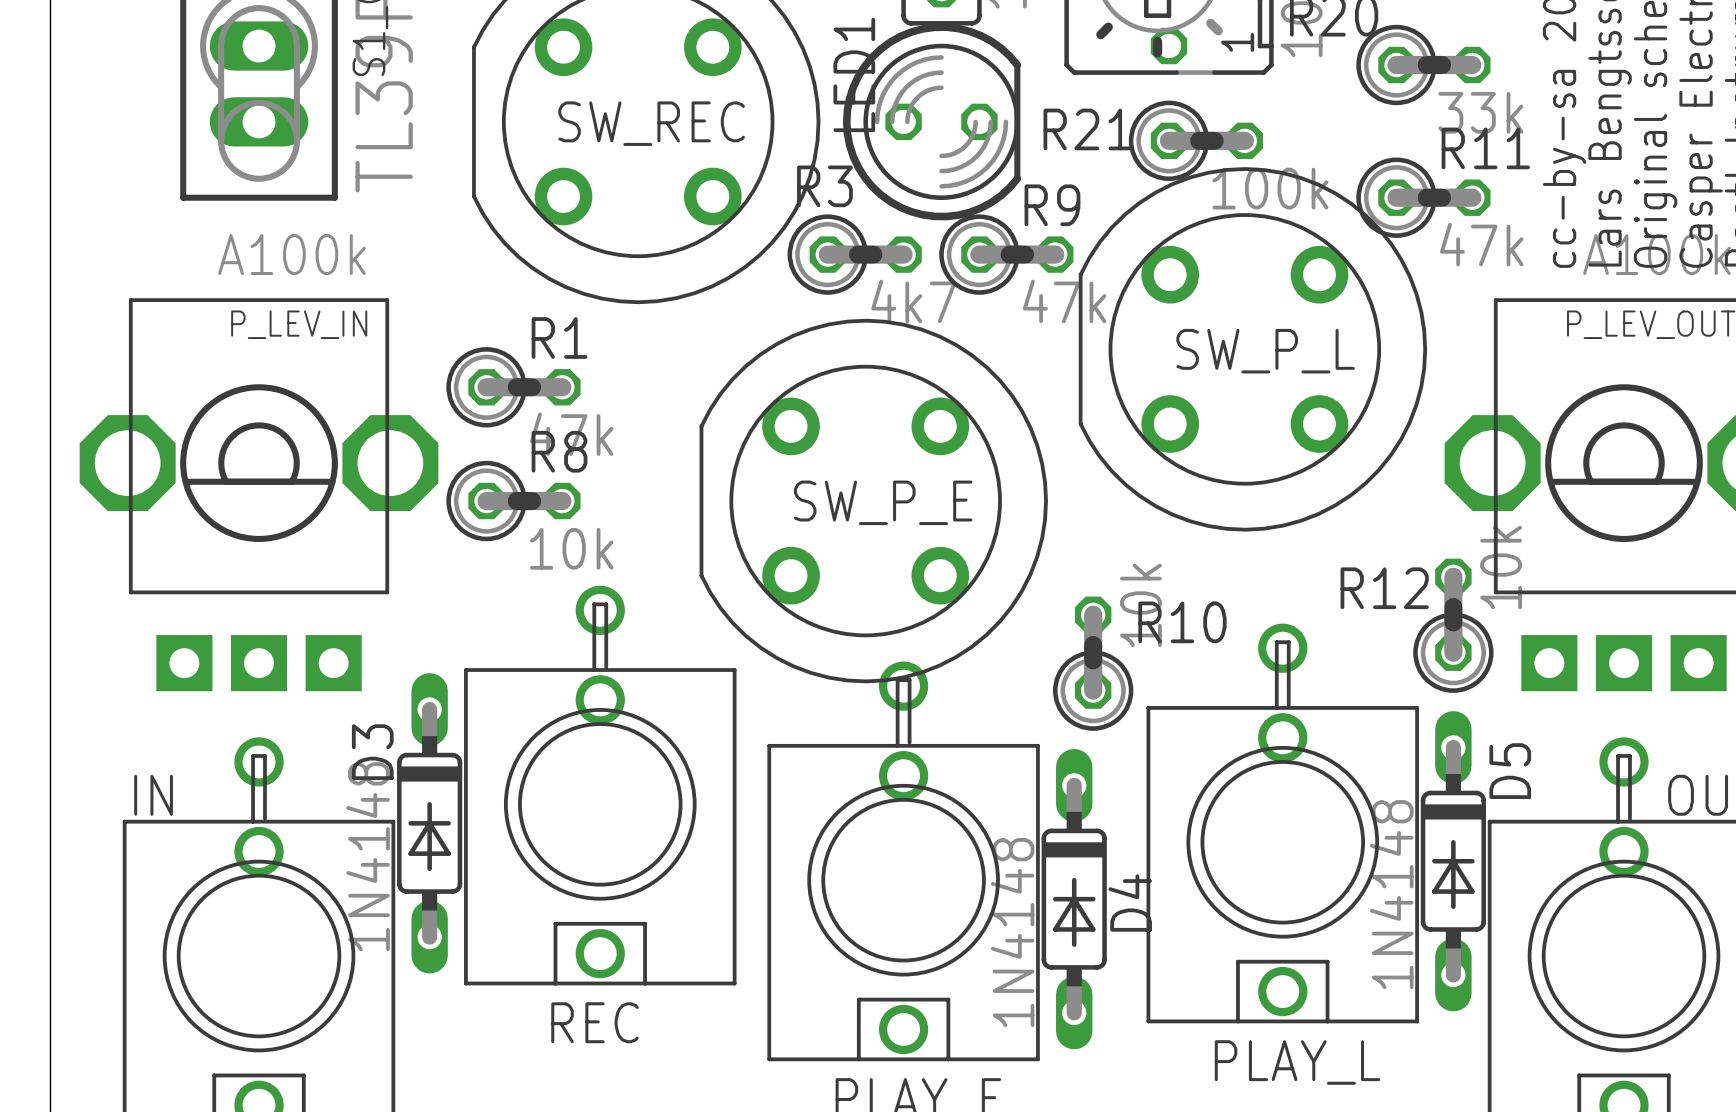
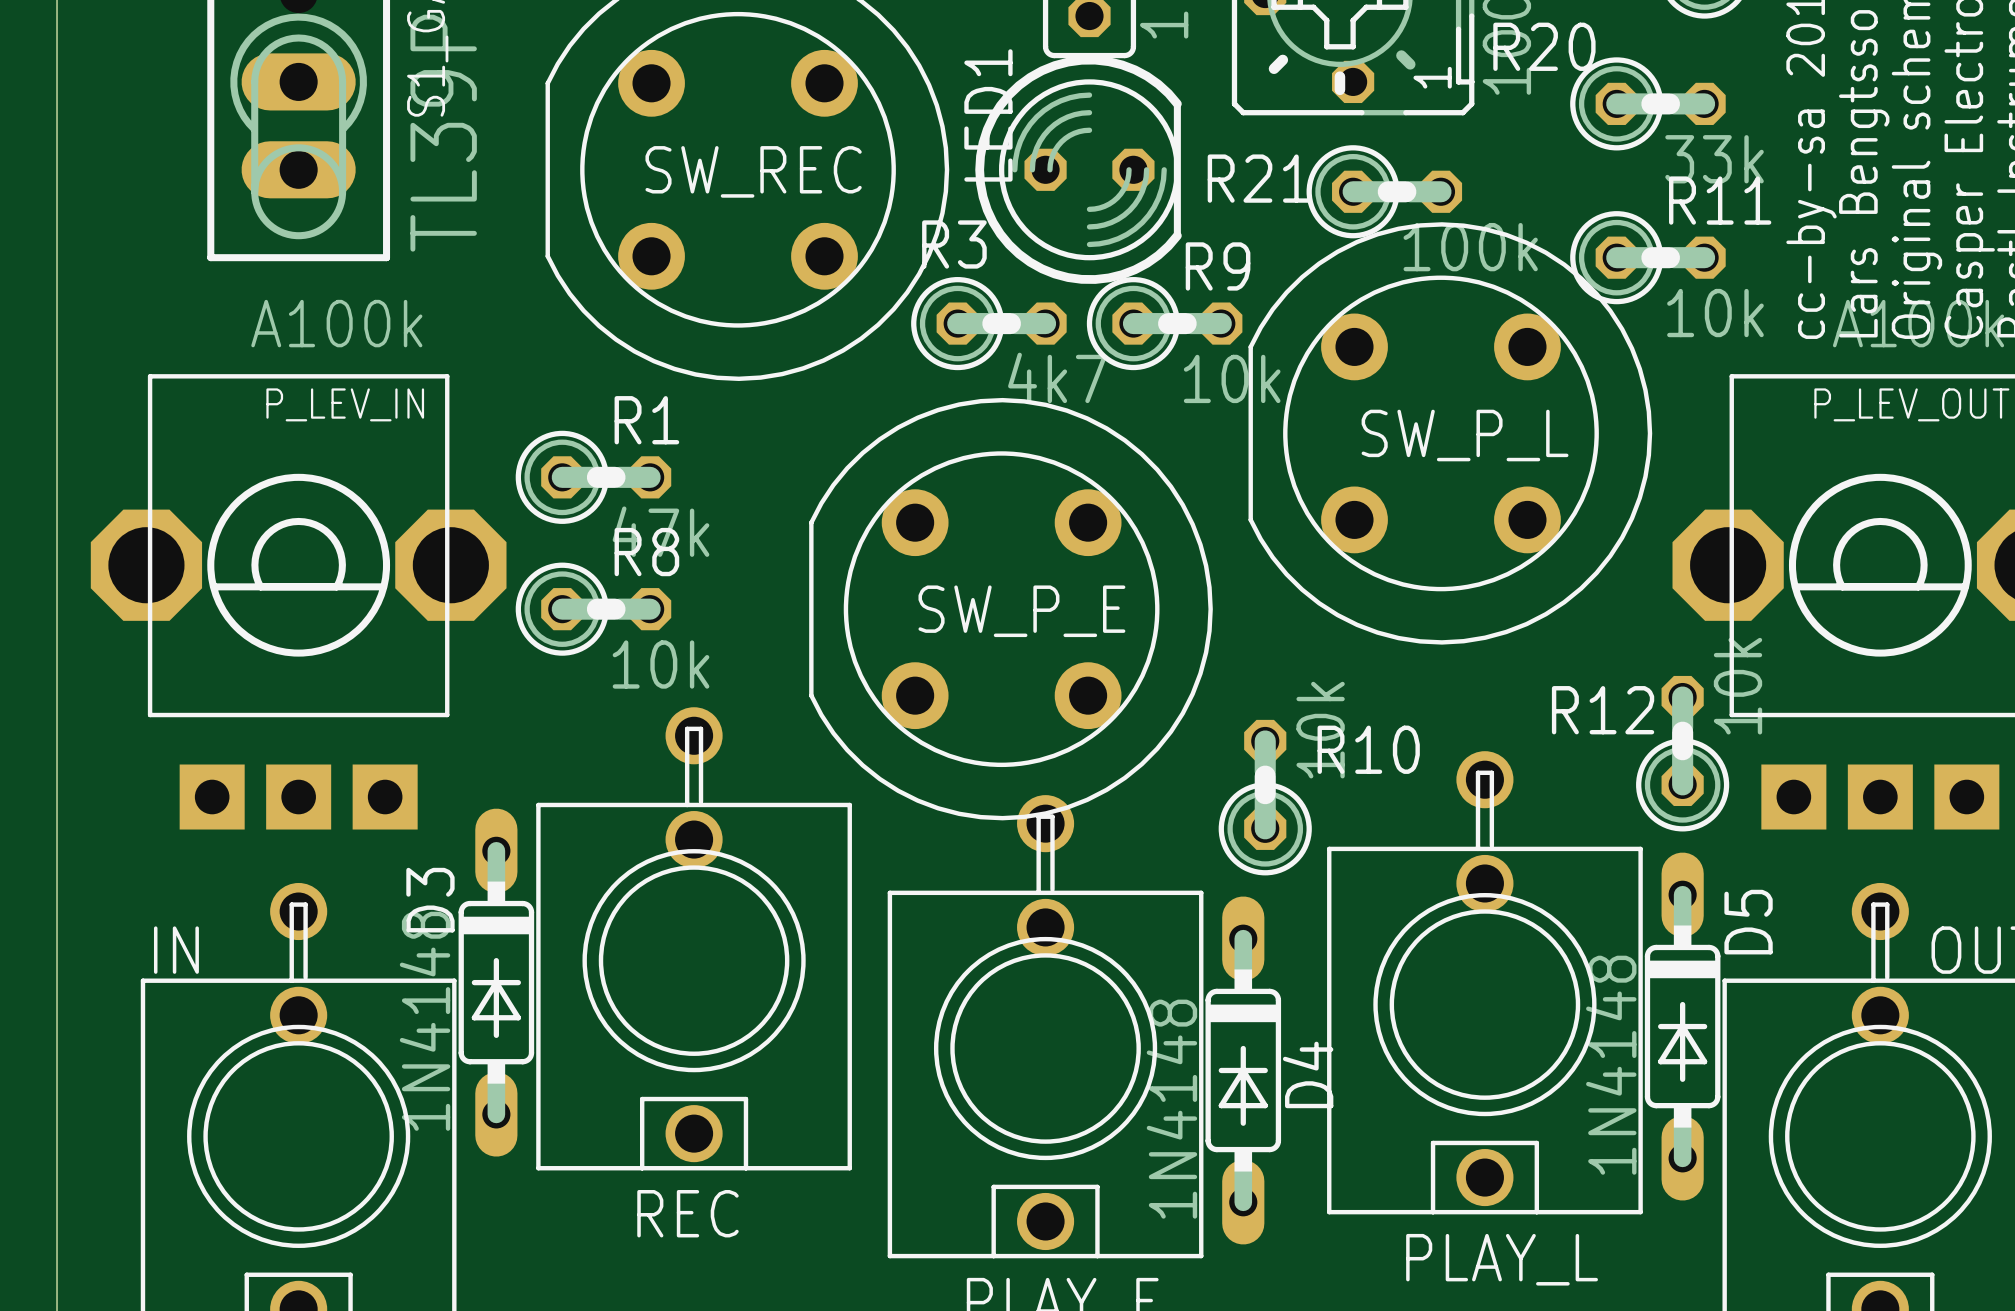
R11 value: 47k (1481, 244) -> 10k (1715, 313)
R9 value: 47k (1064, 301) -> 10k (1232, 378)

